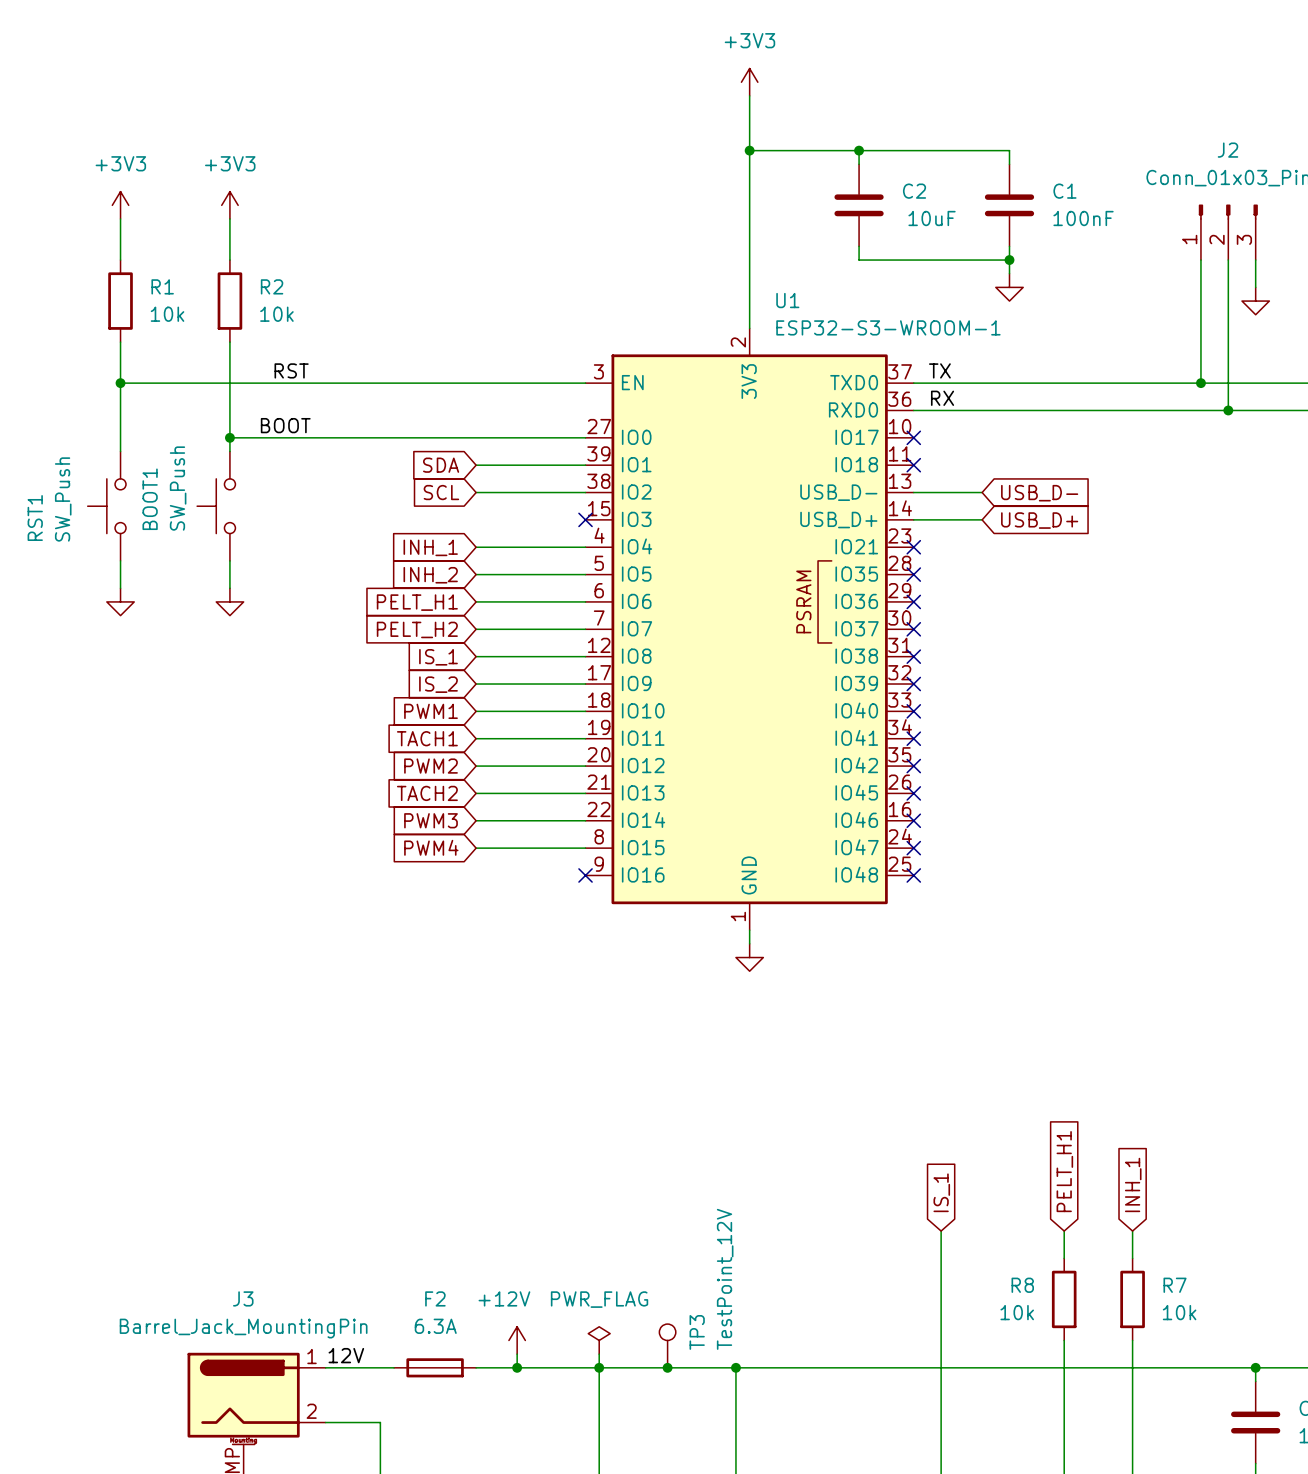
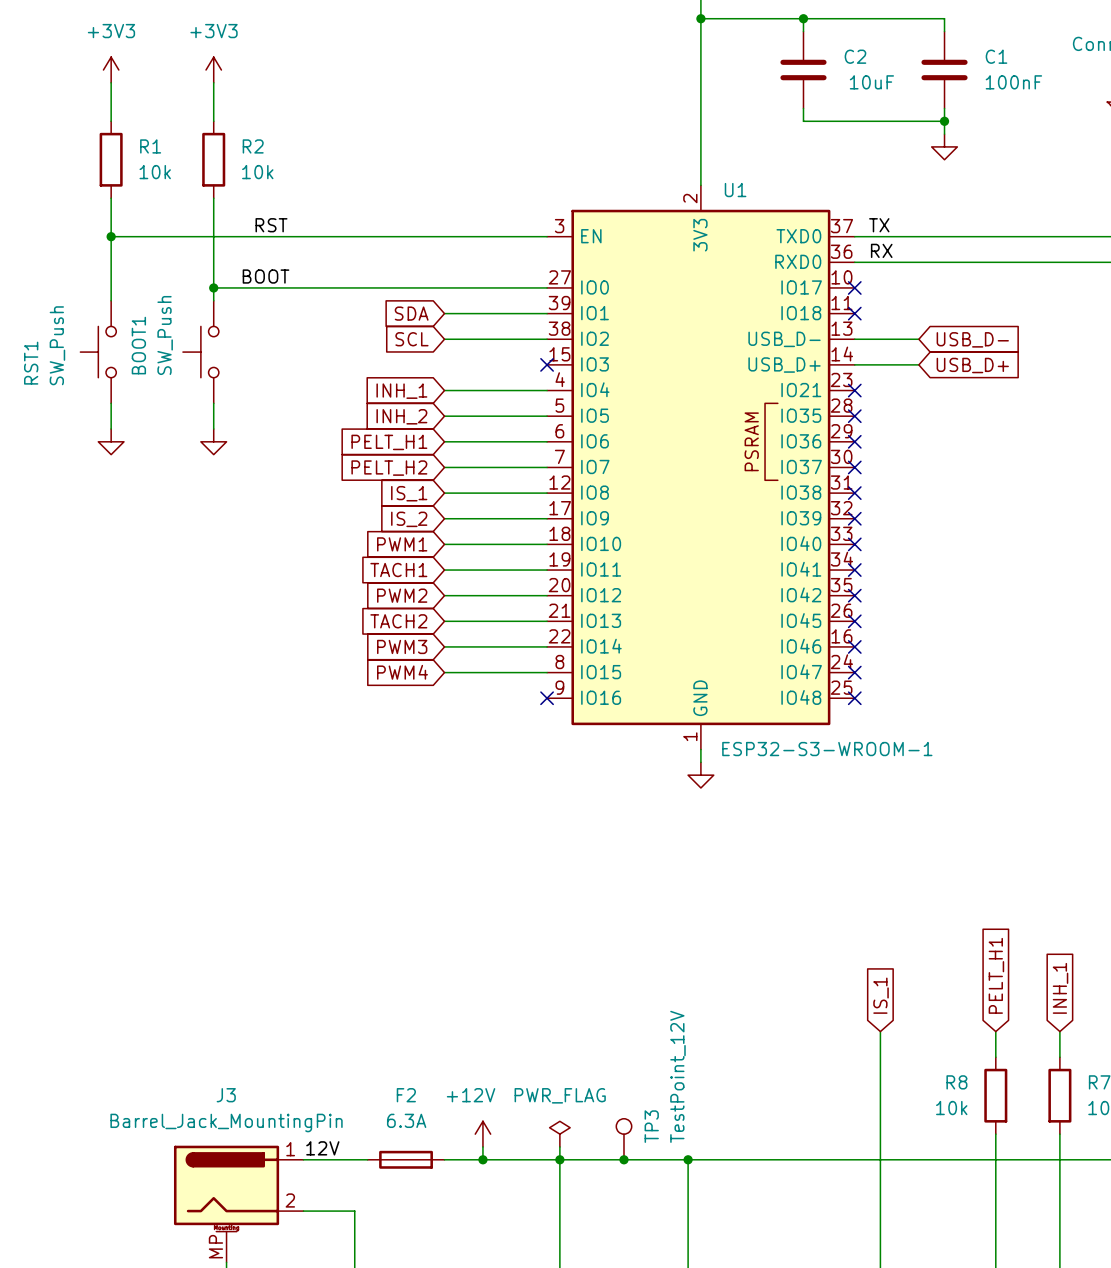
U1 name position: U1 (787, 300) -> U1 (735, 190)
U1 value position: ESP32-S3-WROOM-1 (888, 327) -> ESP32-S3-WROOM-1 (827, 749)

